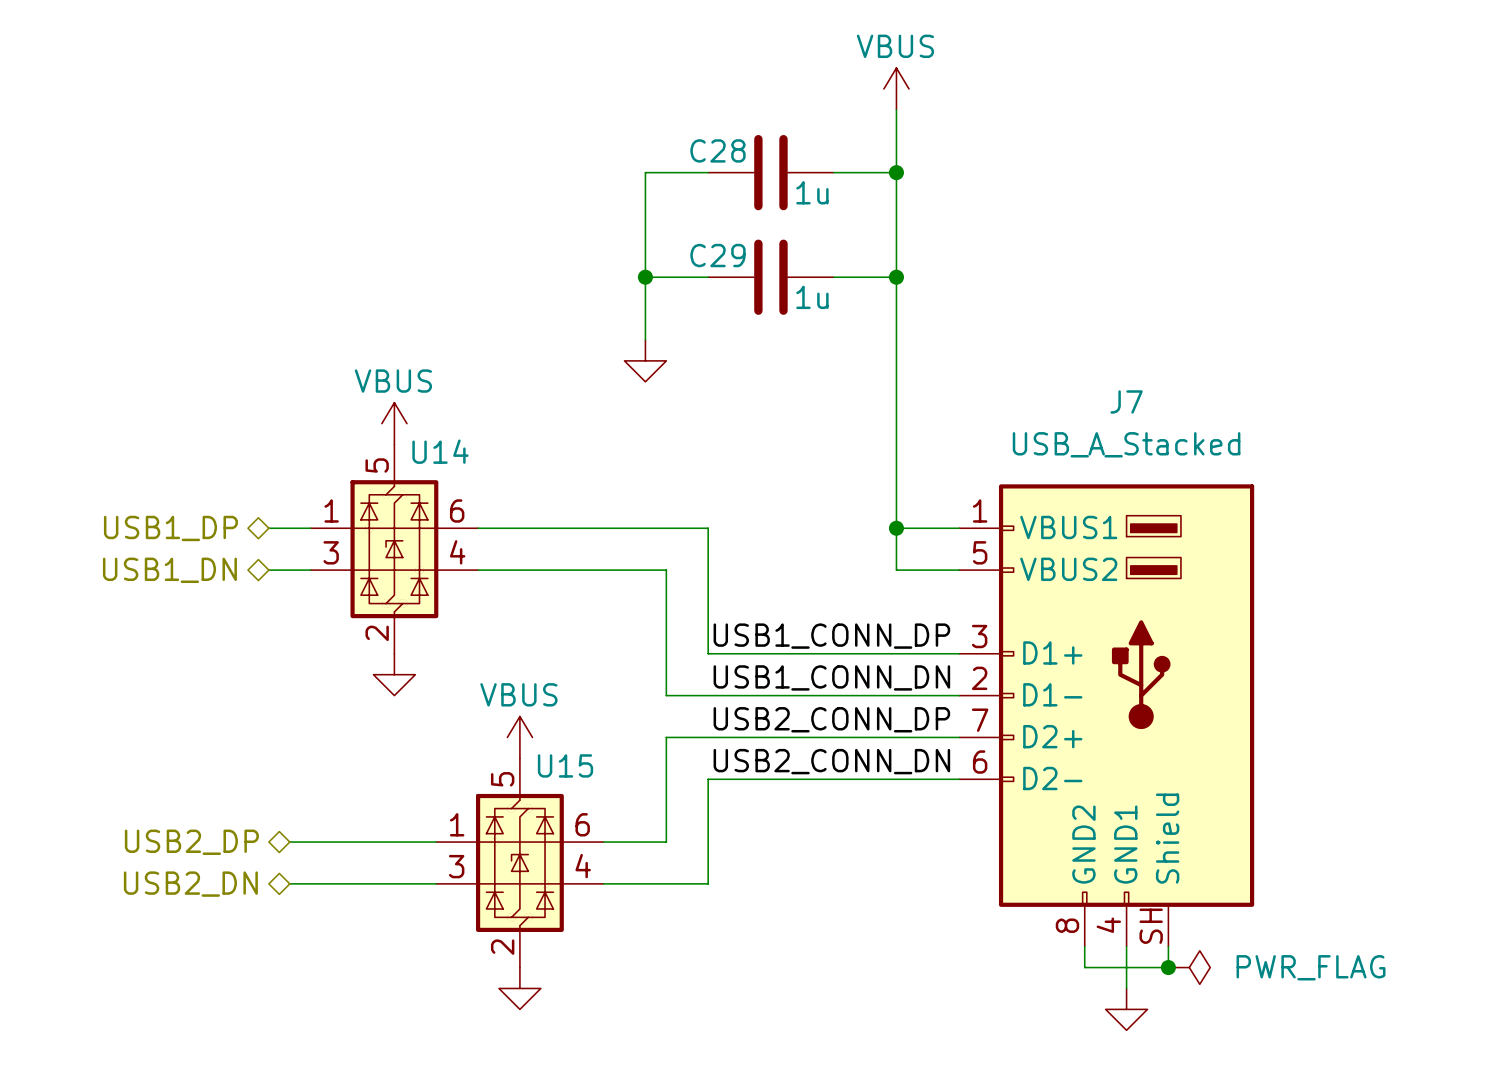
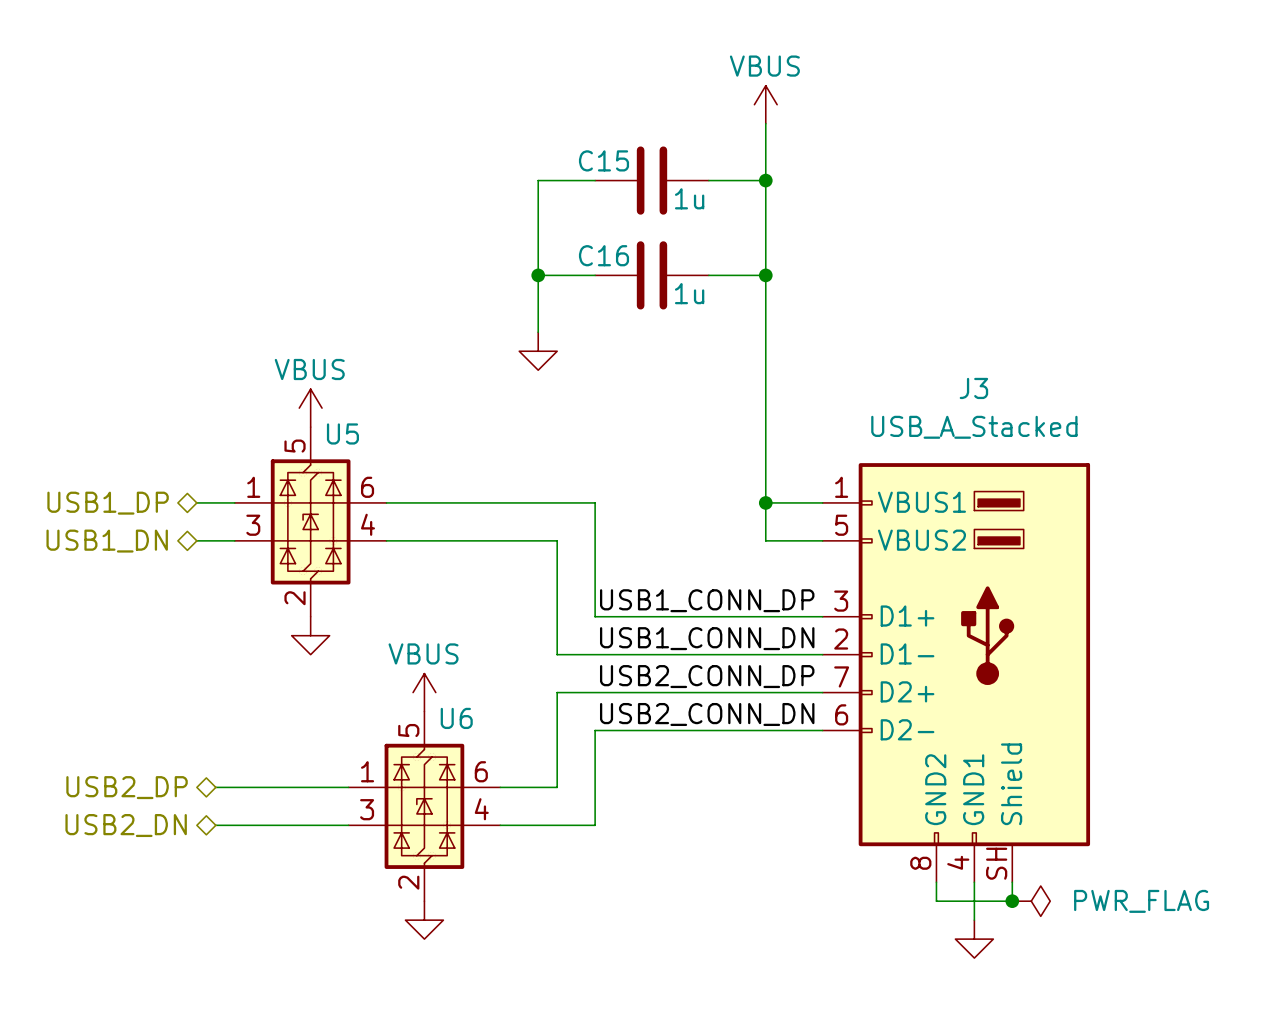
C28 name: C28 (717, 150) -> C15 (603, 160)
C29 name: C29 (717, 255) -> C16 (603, 255)
J7 name: J7 (1126, 401) -> J3 (973, 388)
U14 name: U14 (440, 451) -> U5 (342, 433)
U15 name: U15 (565, 765) -> U6 (456, 718)

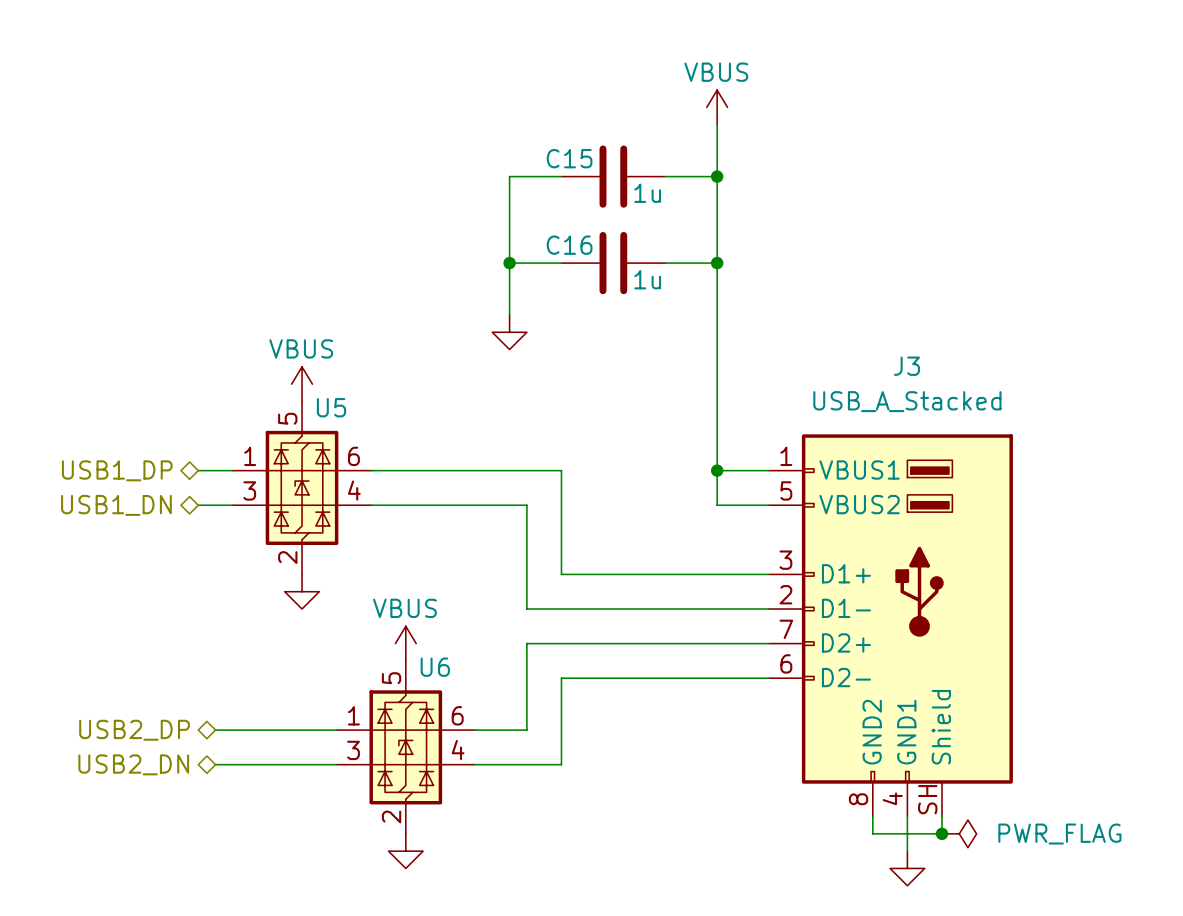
label: USB1_CONN_DP (707, 600) -> none
label: USB1_CONN_DN (707, 638) -> none
label: USB2_CONN_DP (707, 676) -> none
label: USB2_CONN_DN (707, 714) -> none

